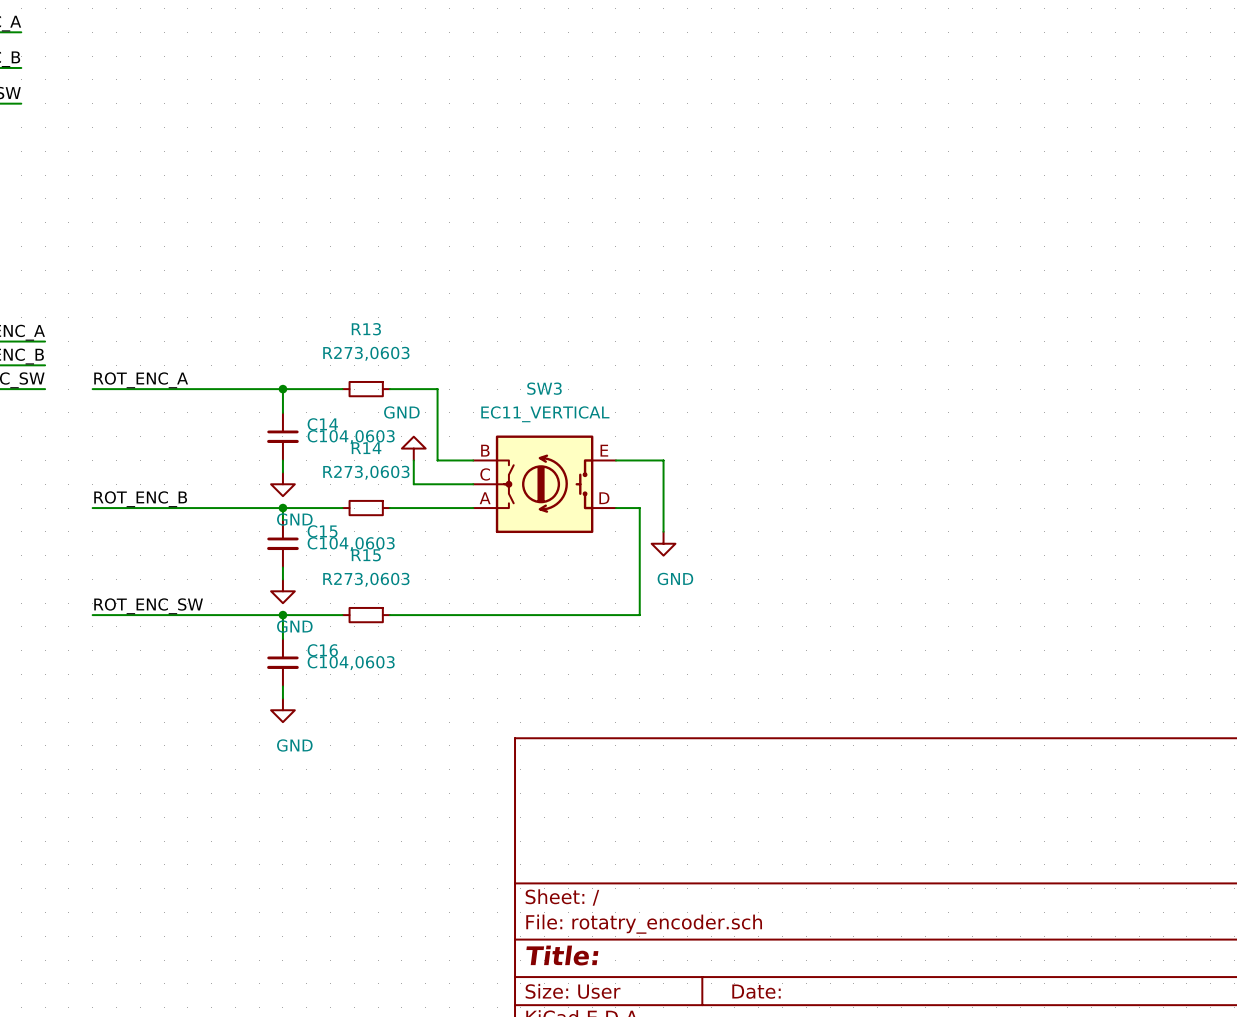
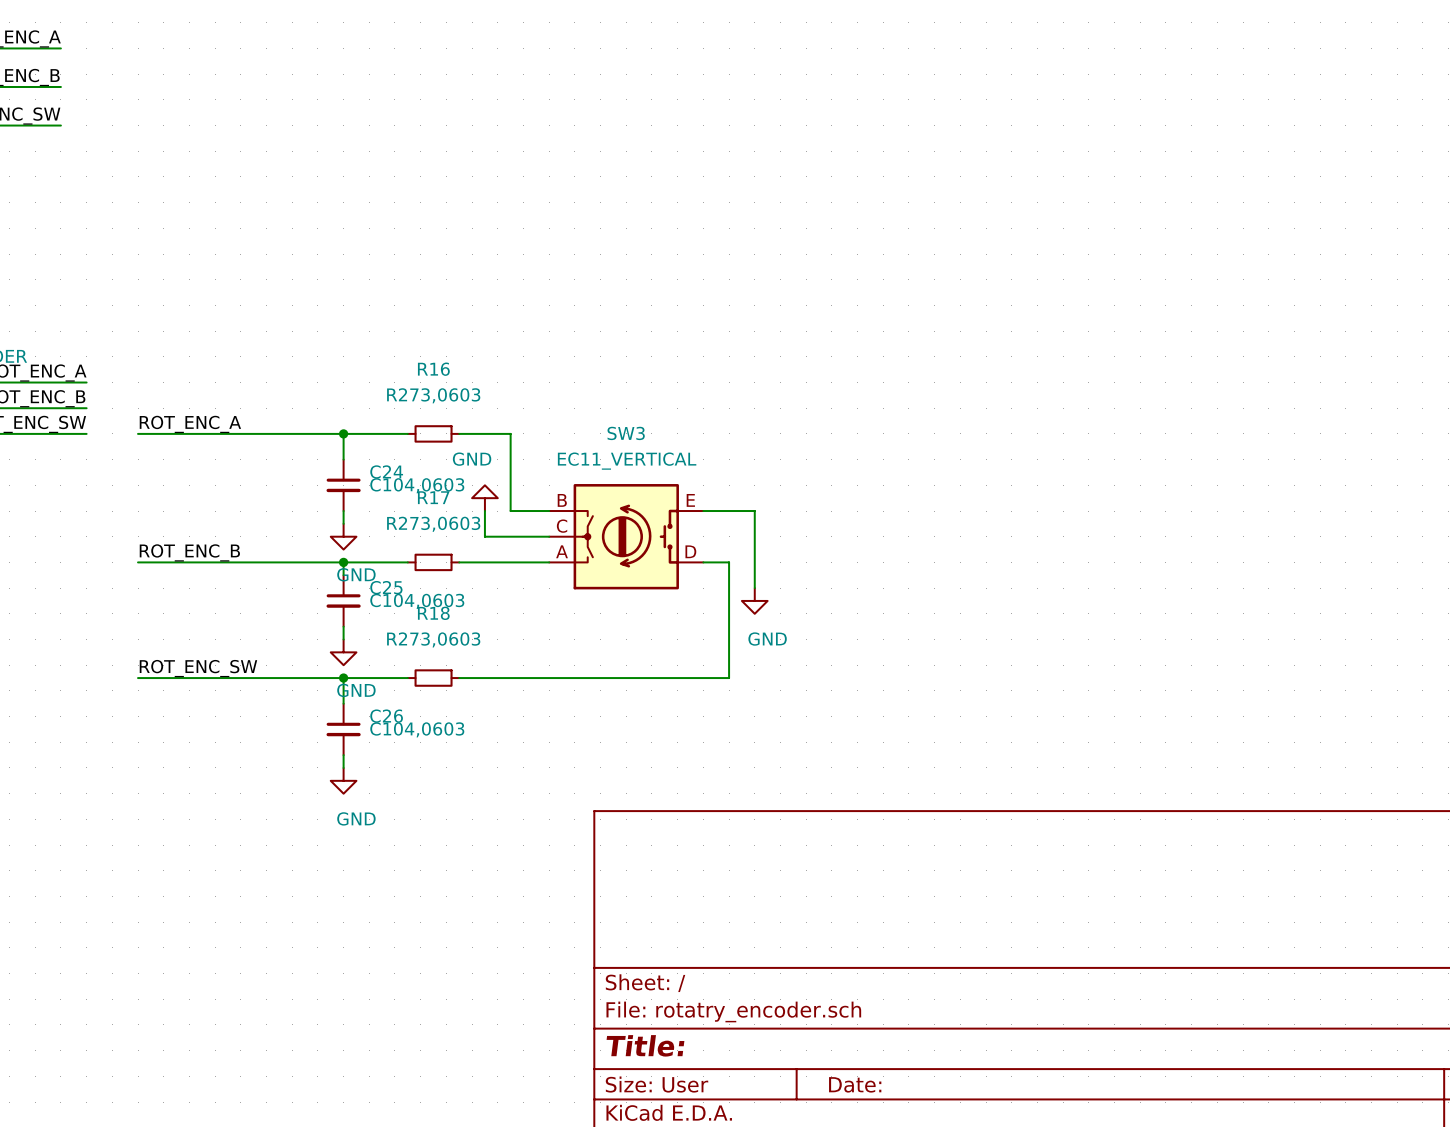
R13 name: R13 (366, 329) -> R16 (433, 369)
C14 name: C14 (322, 424) -> C24 (386, 471)
R14 name: R14 (366, 448) -> R17 (433, 497)
C15 name: C15 (322, 531) -> C25 (386, 587)
R15 name: R15 (366, 555) -> R18 (433, 613)
C16 name: C16 (322, 650) -> C26 (386, 716)

